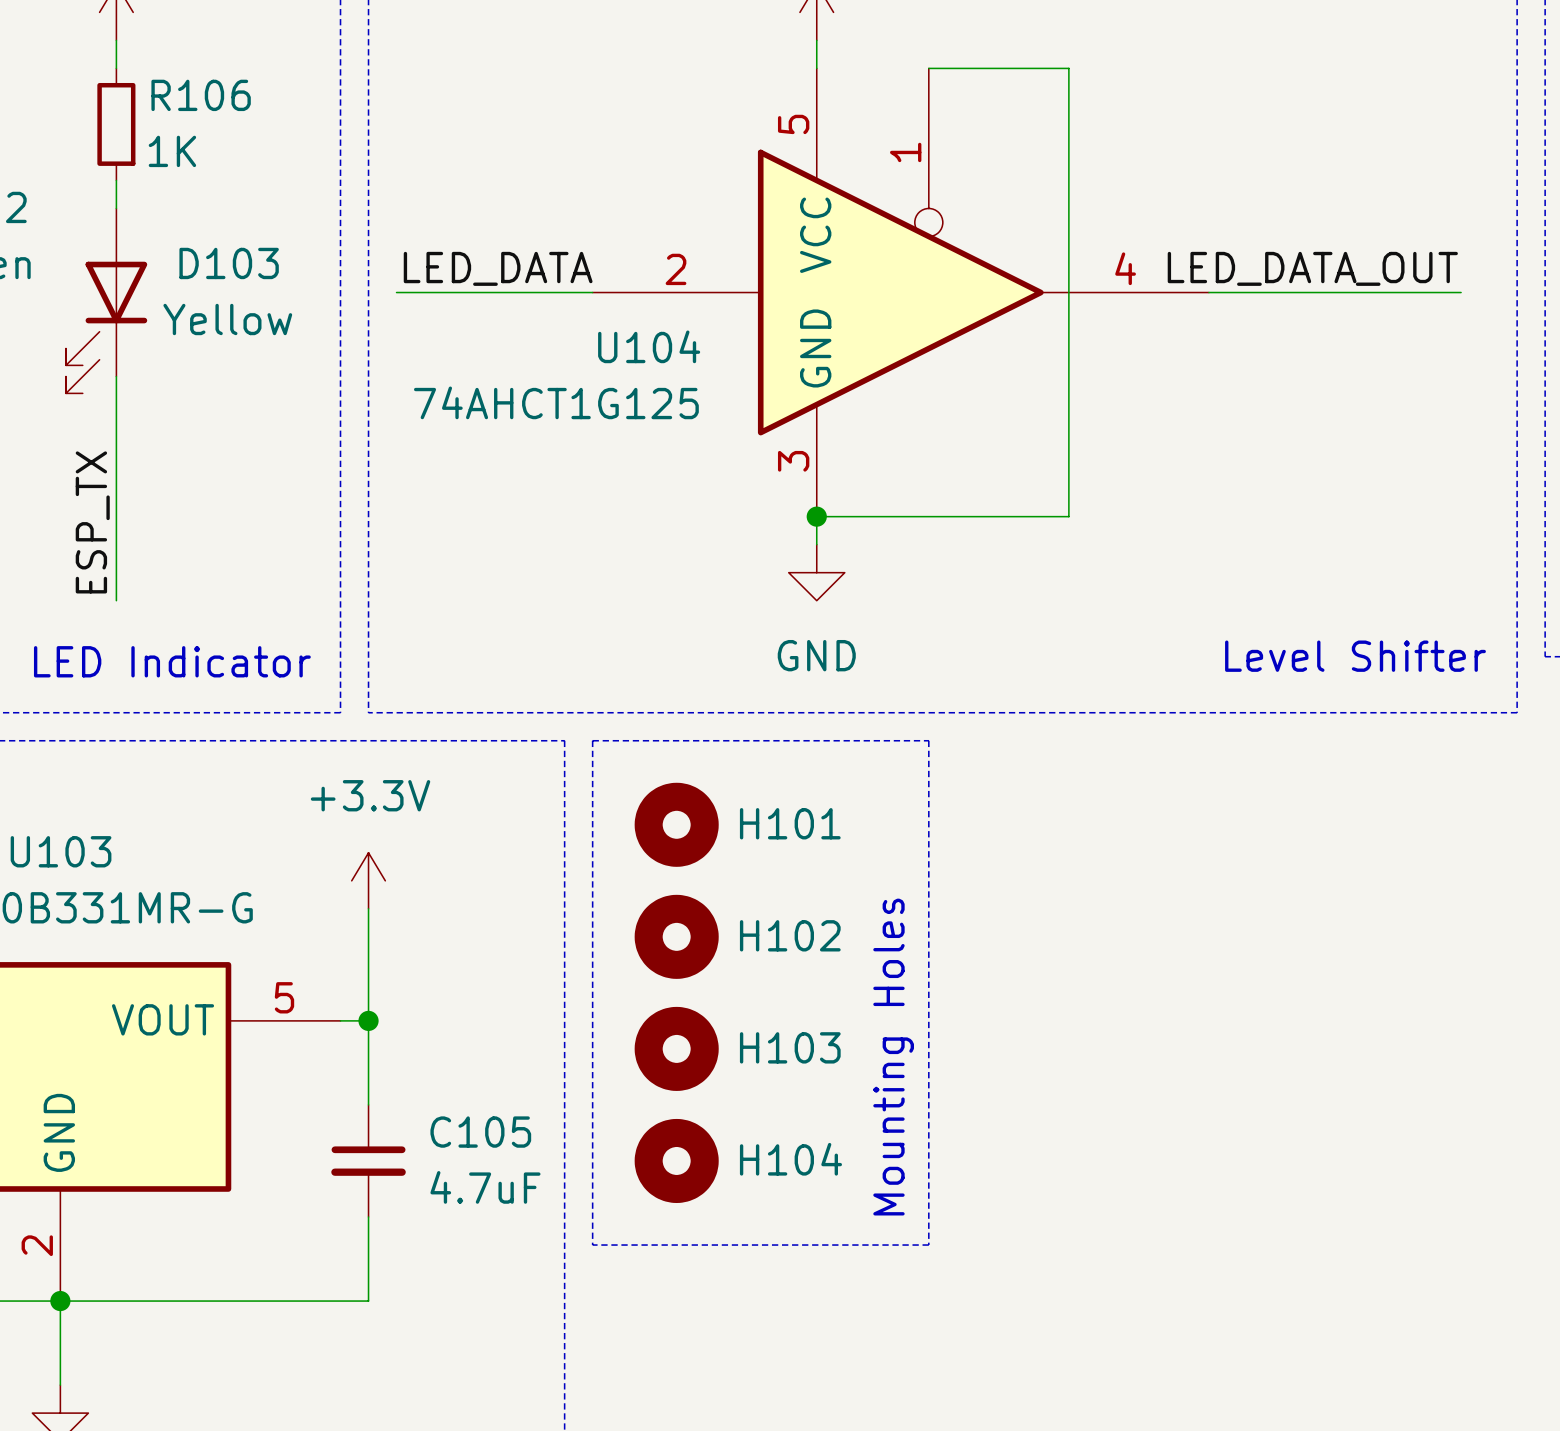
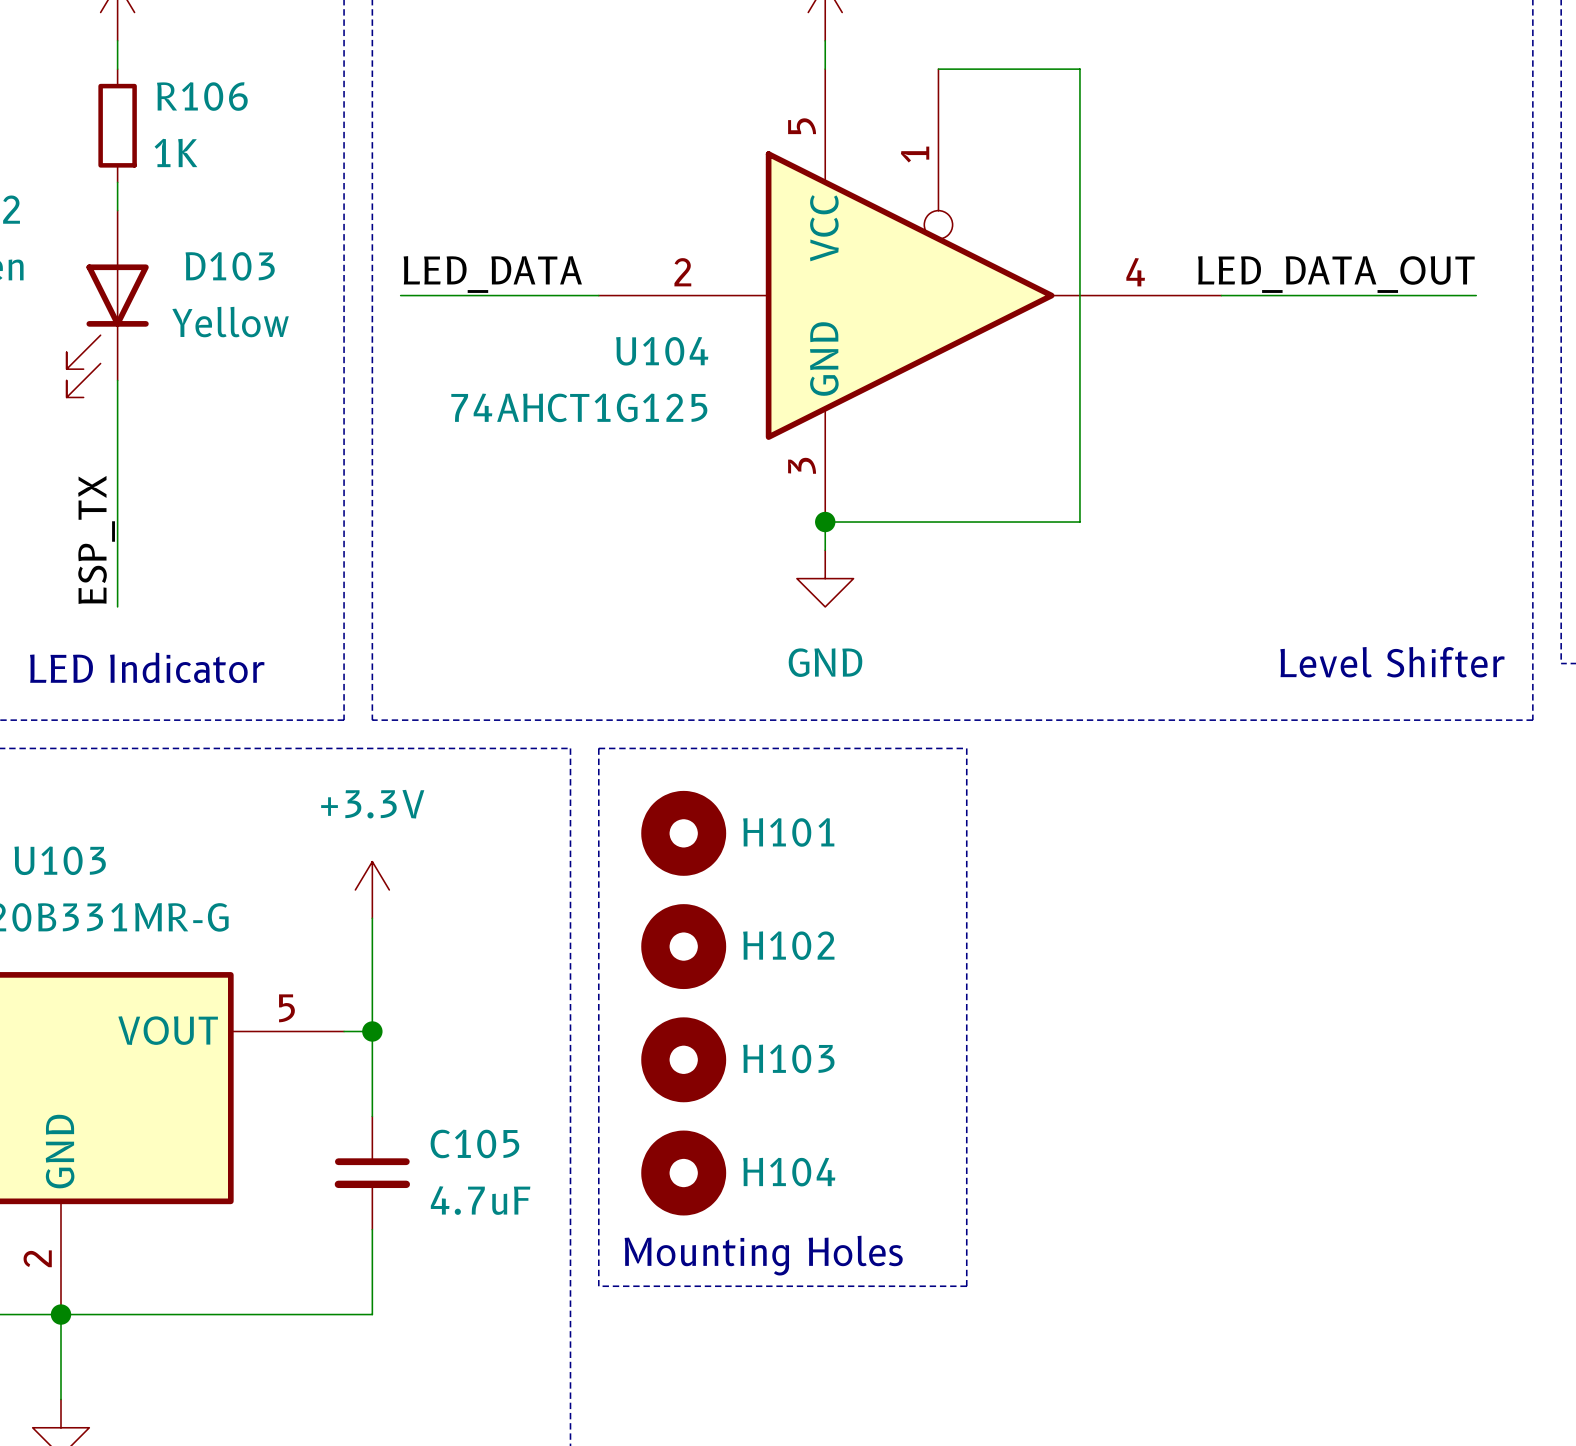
line: (928, 740) (928, 1245) (592, 1245) -> (938, 748) (966, 748) (966, 1286) (598, 1286) (598, 1257)
text rotation: 0° (893, 1057) -> 90° clockwise (763, 1255)

